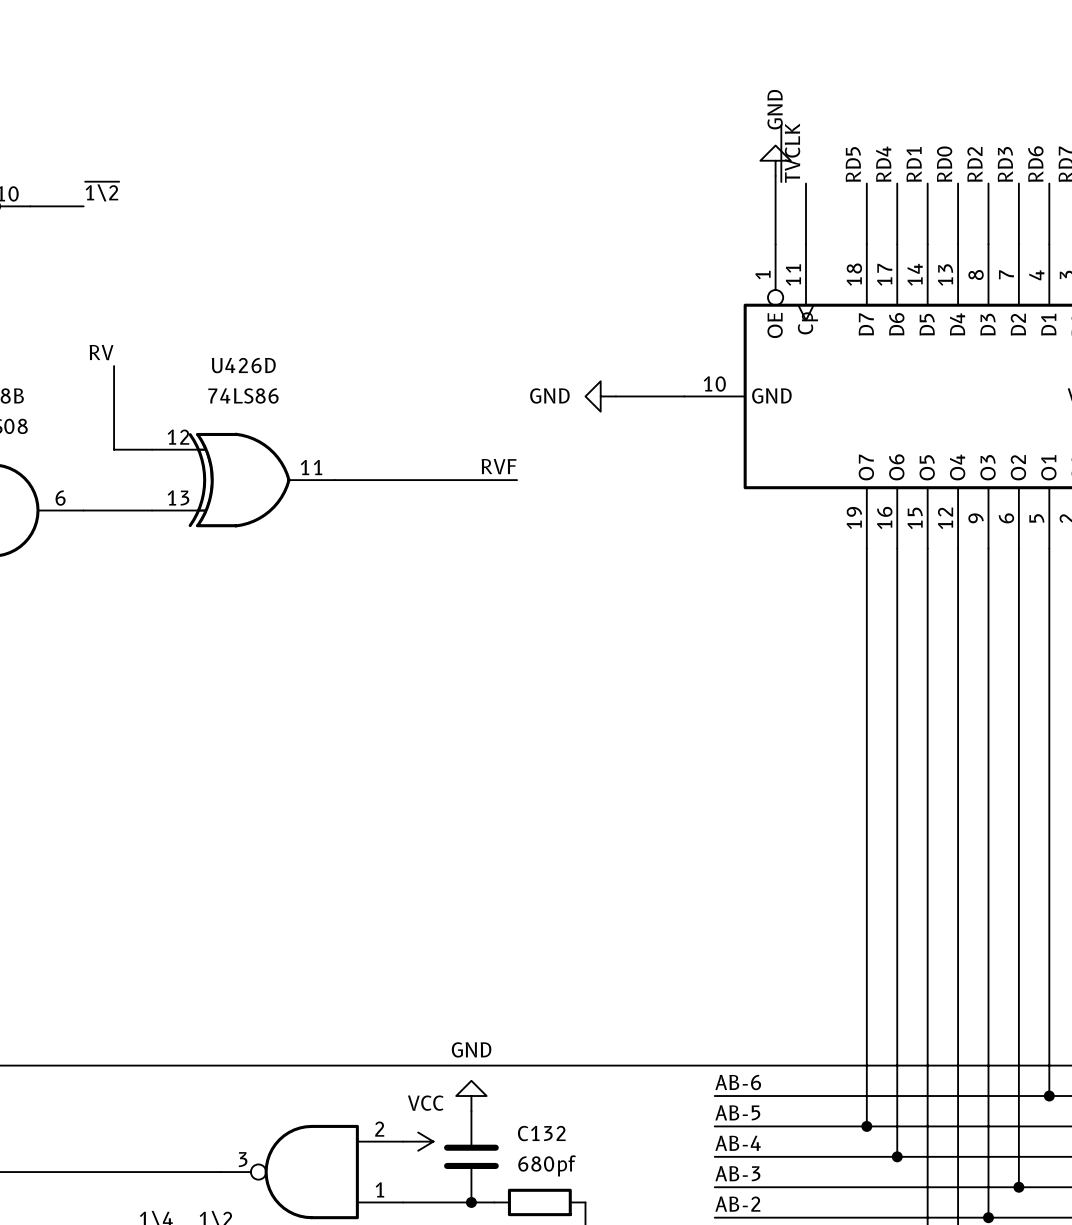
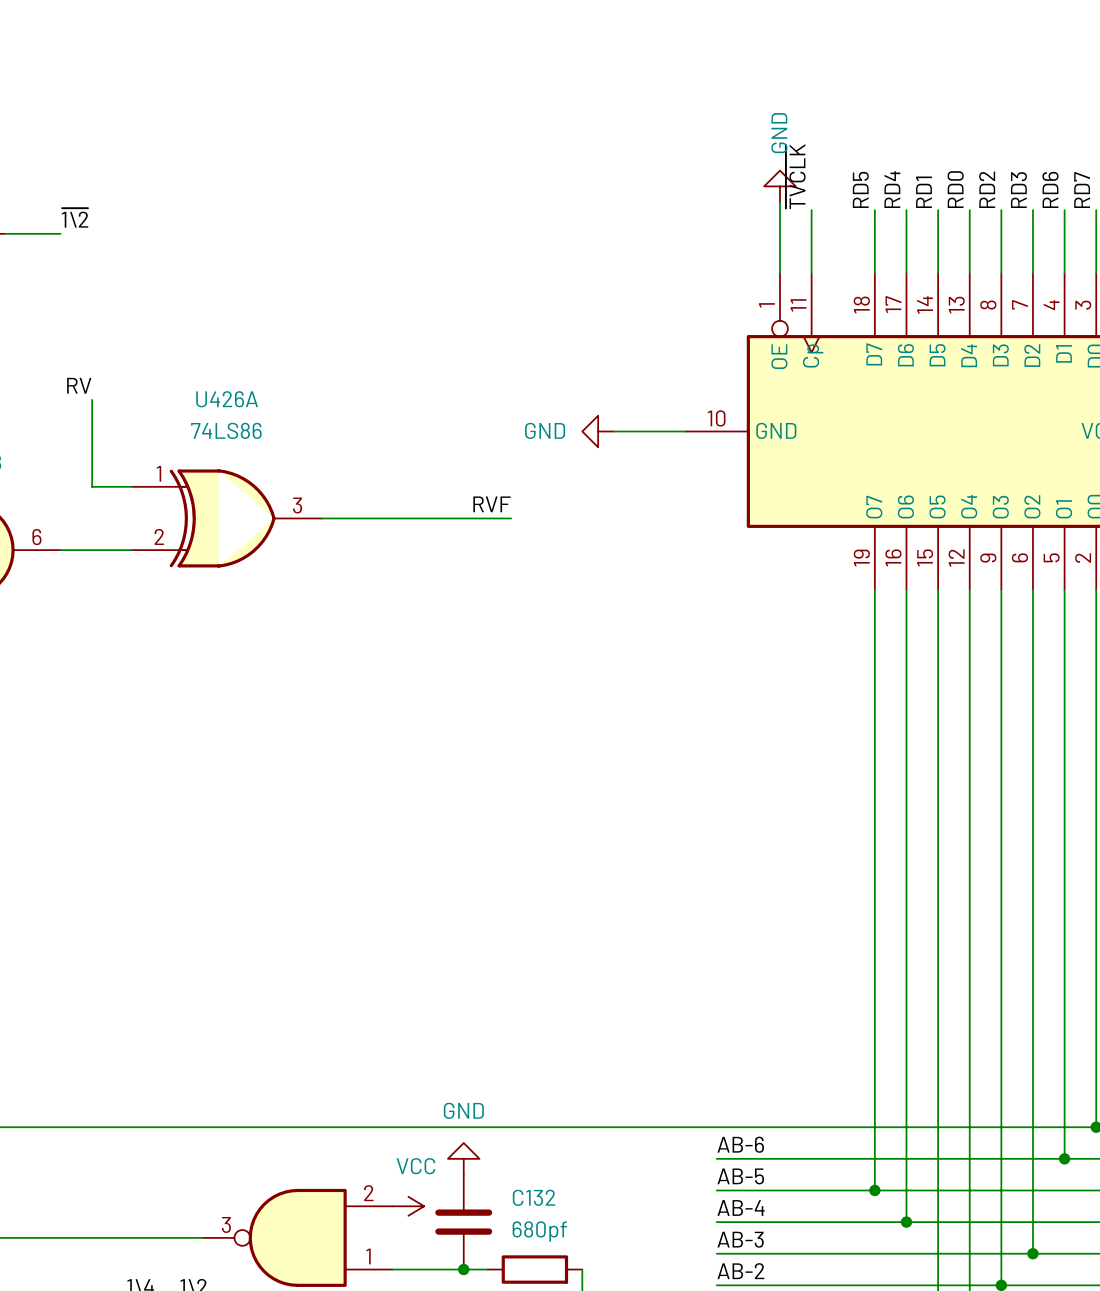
U426D name: U426D (243, 365) -> U426A (227, 399)
U426D pin number: 12 (178, 437) -> 1 (158, 473)
U426D pin number: 11 (311, 467) -> 3 (297, 505)
U426D pin number: 13 (178, 497) -> 2 (159, 536)

